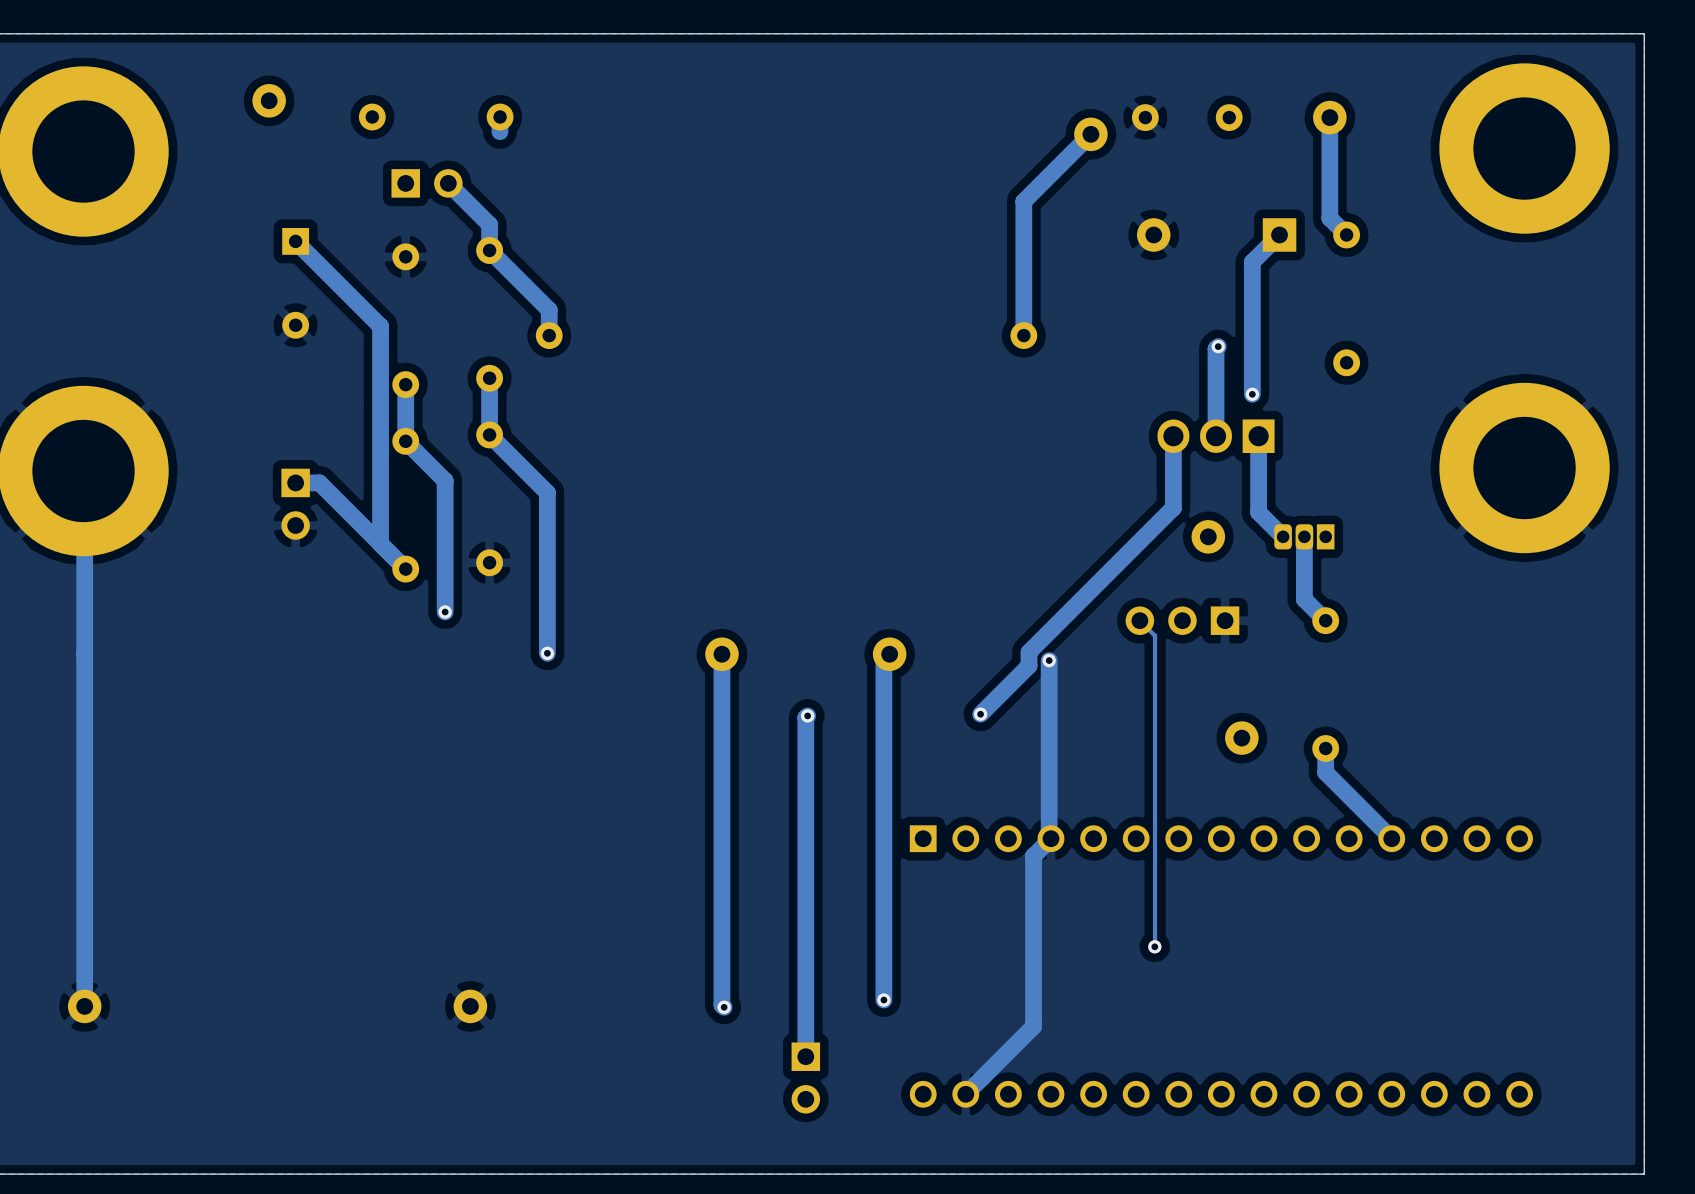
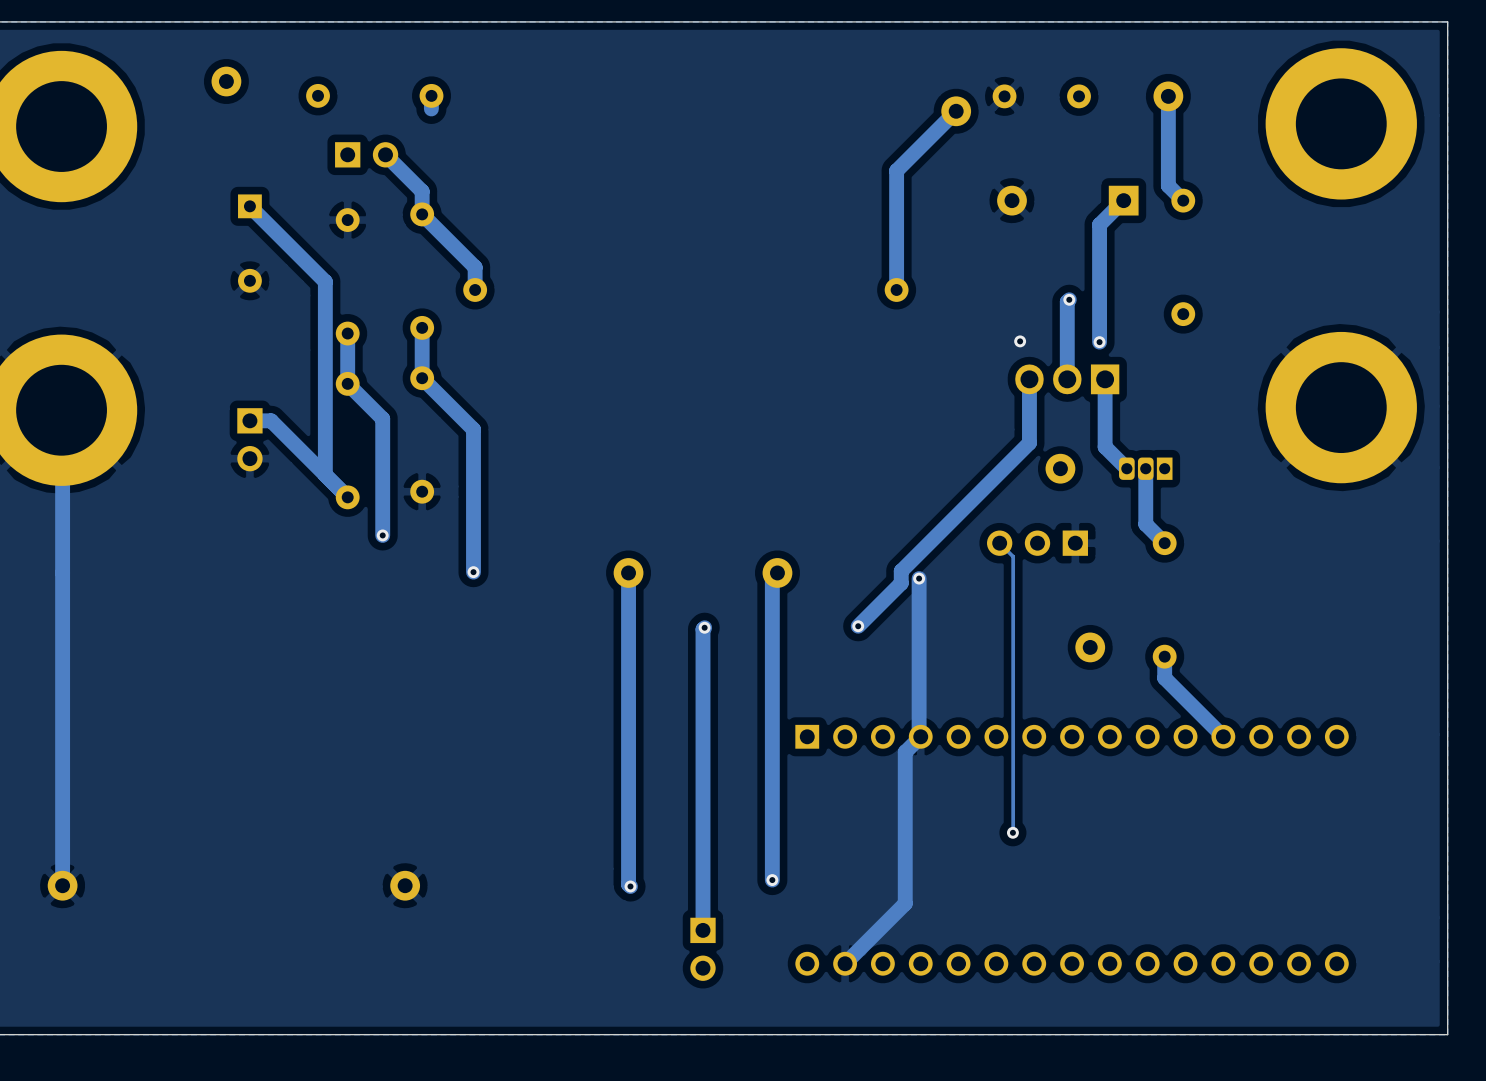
via: none -> (1020, 341)

